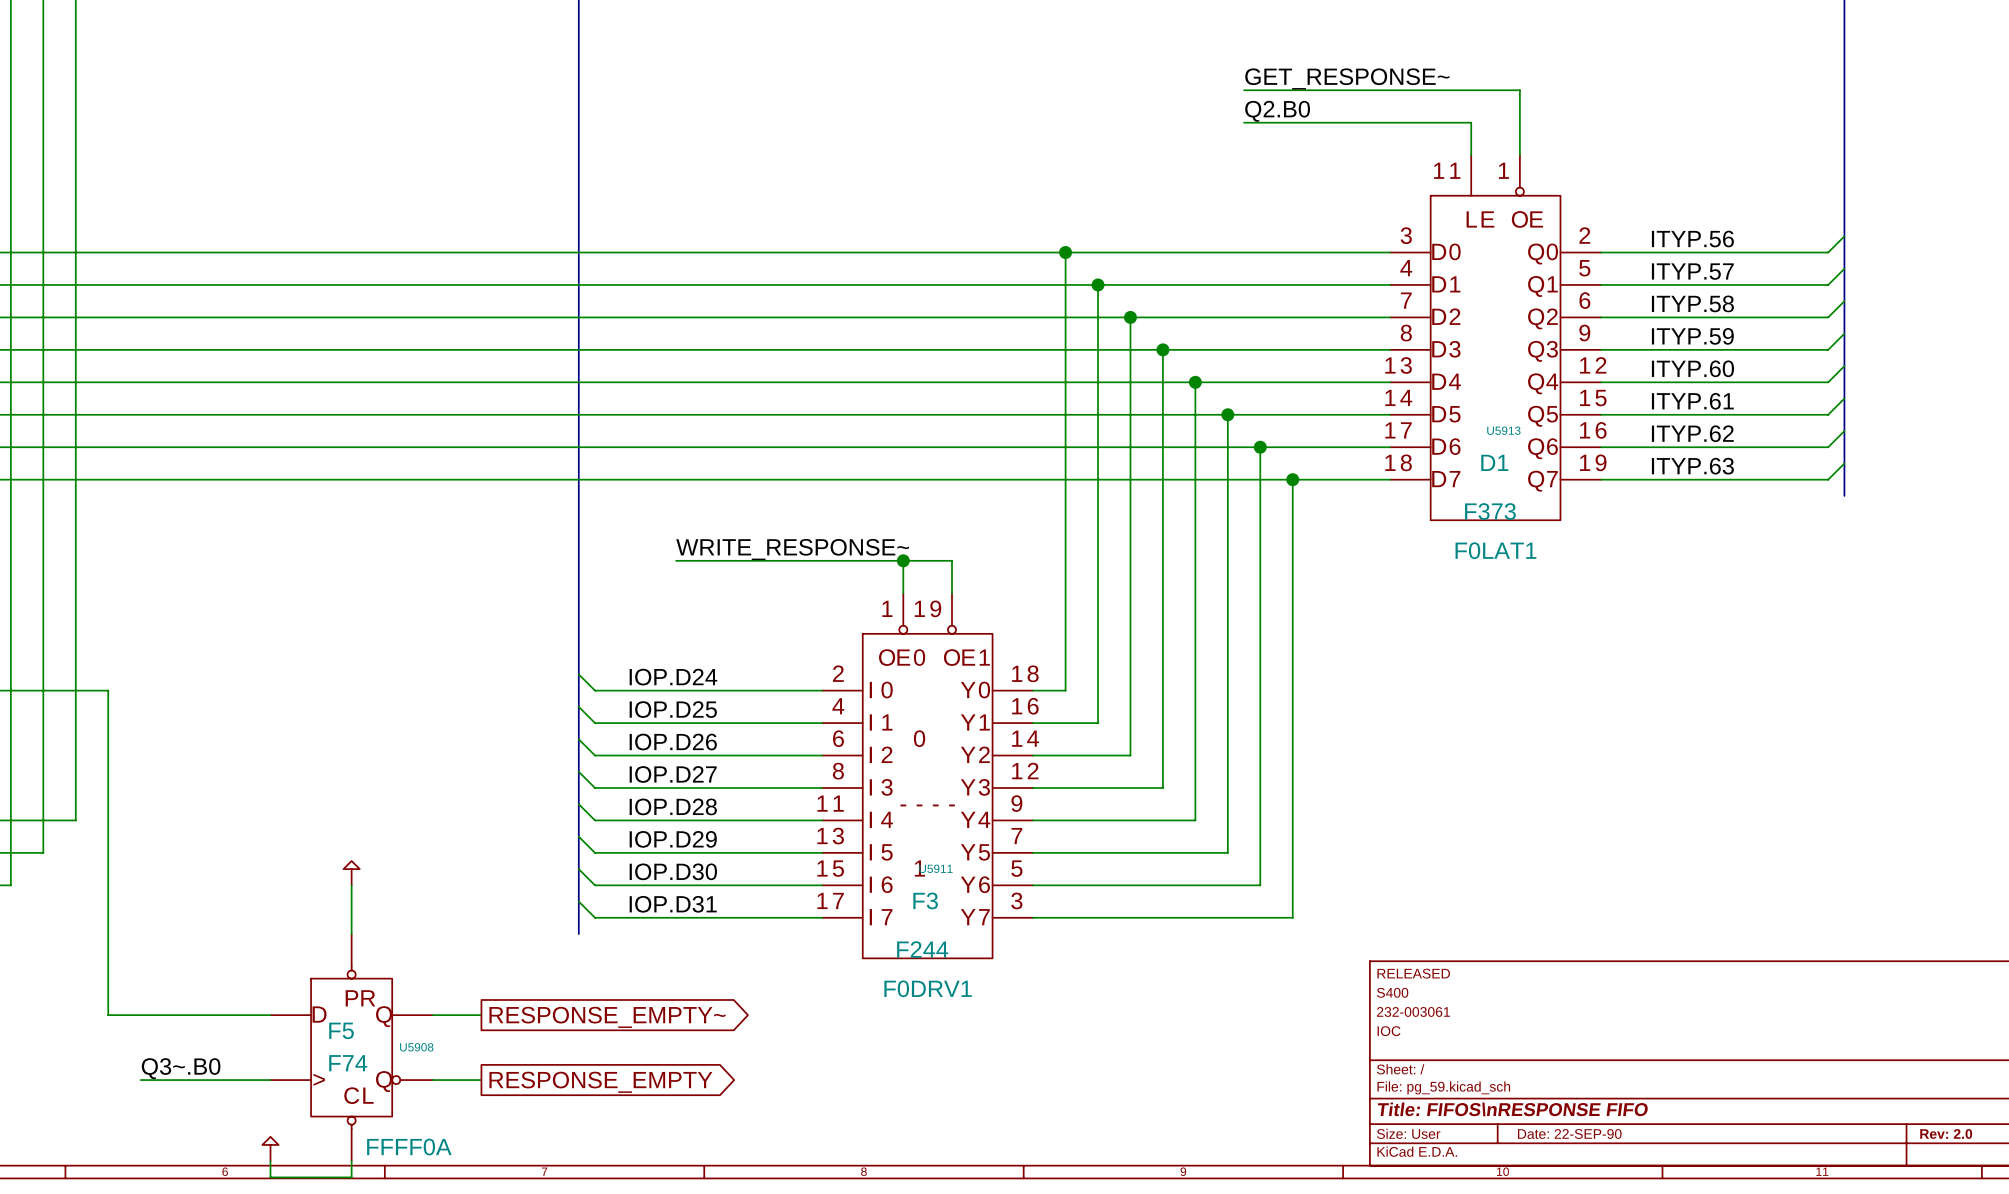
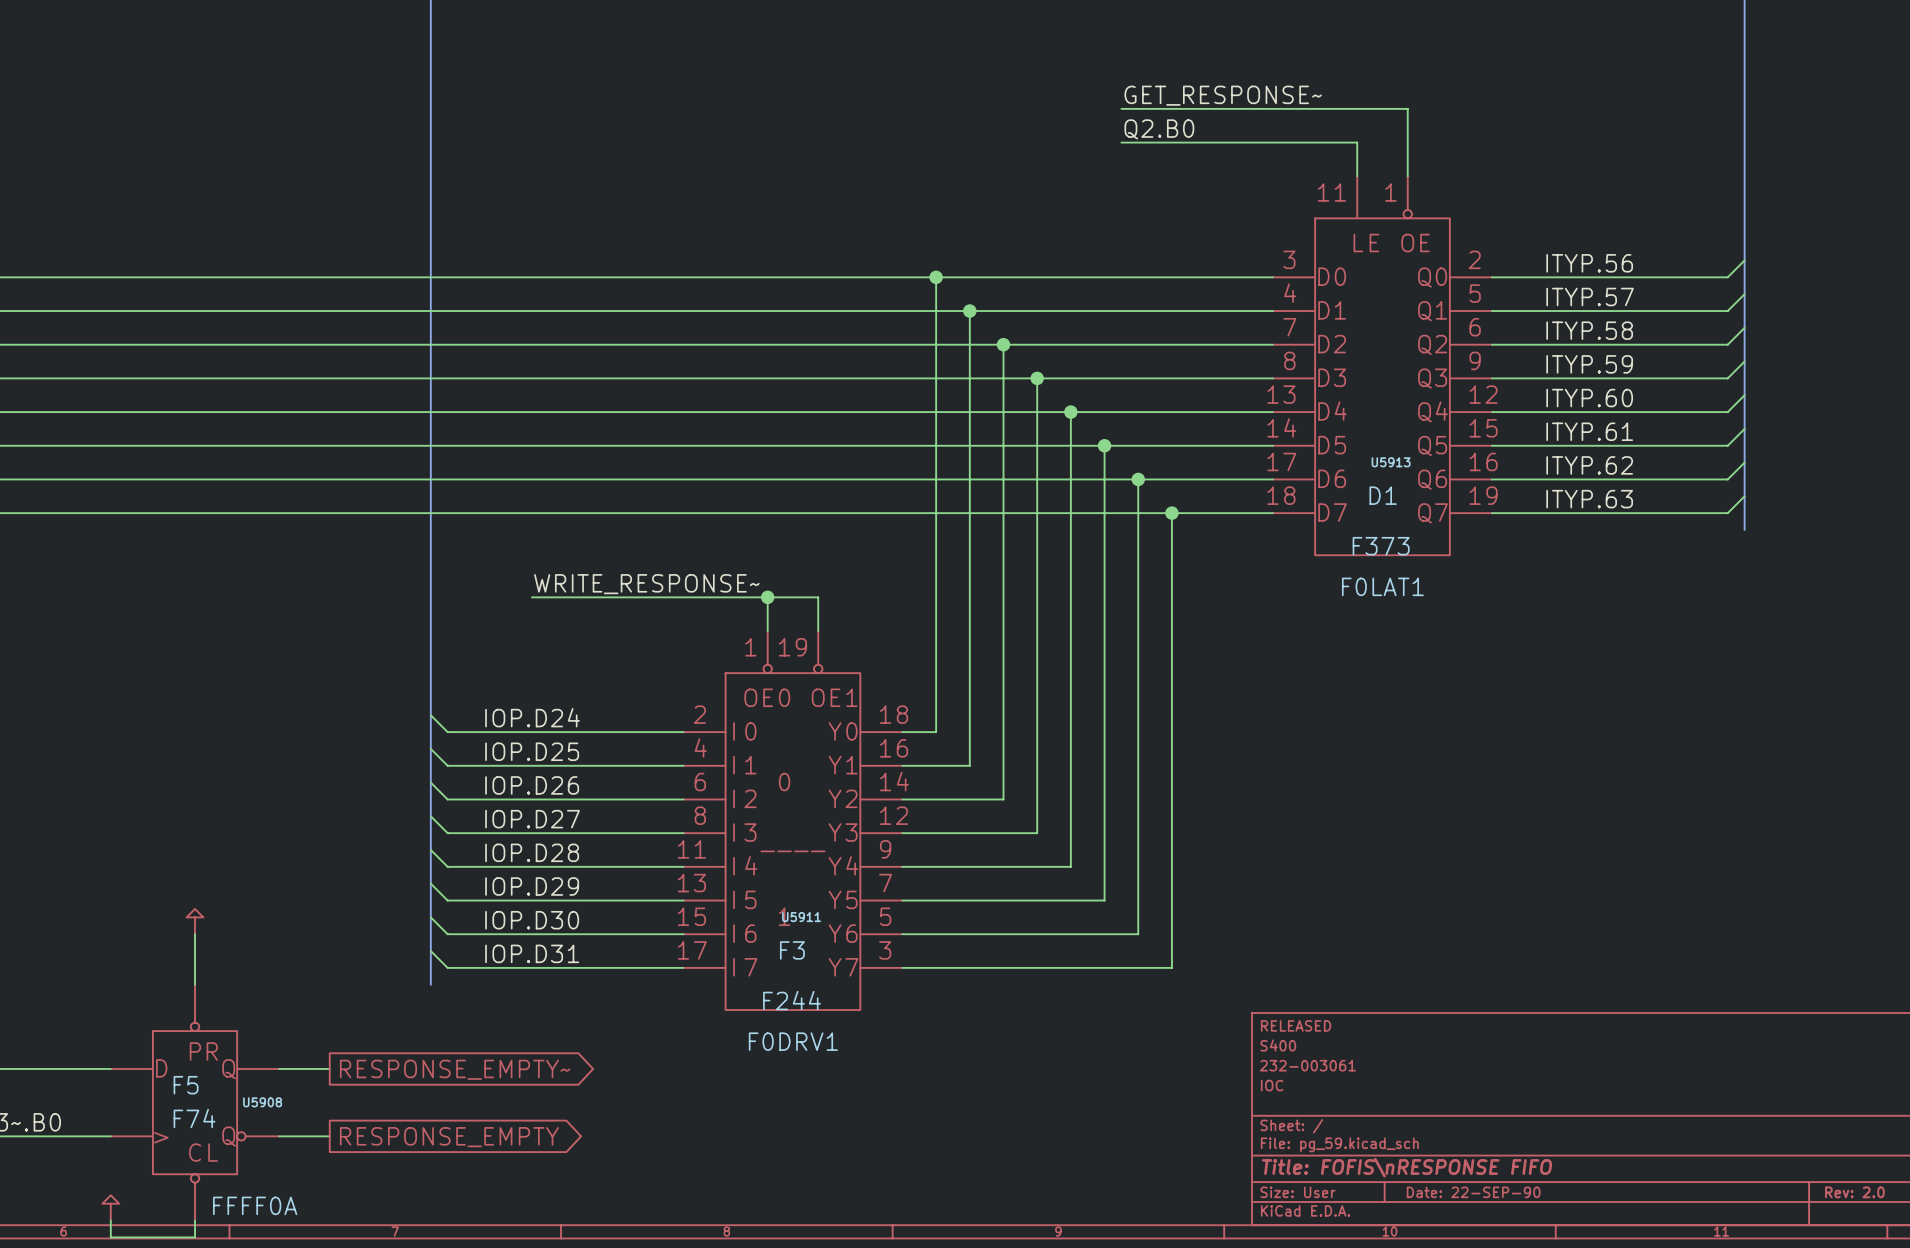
title block: Title: FIFOS\nRESPONSE FIFO (1512, 1109) -> Title: FOFIS\nRESPONSE FIFO (1407, 1167)

